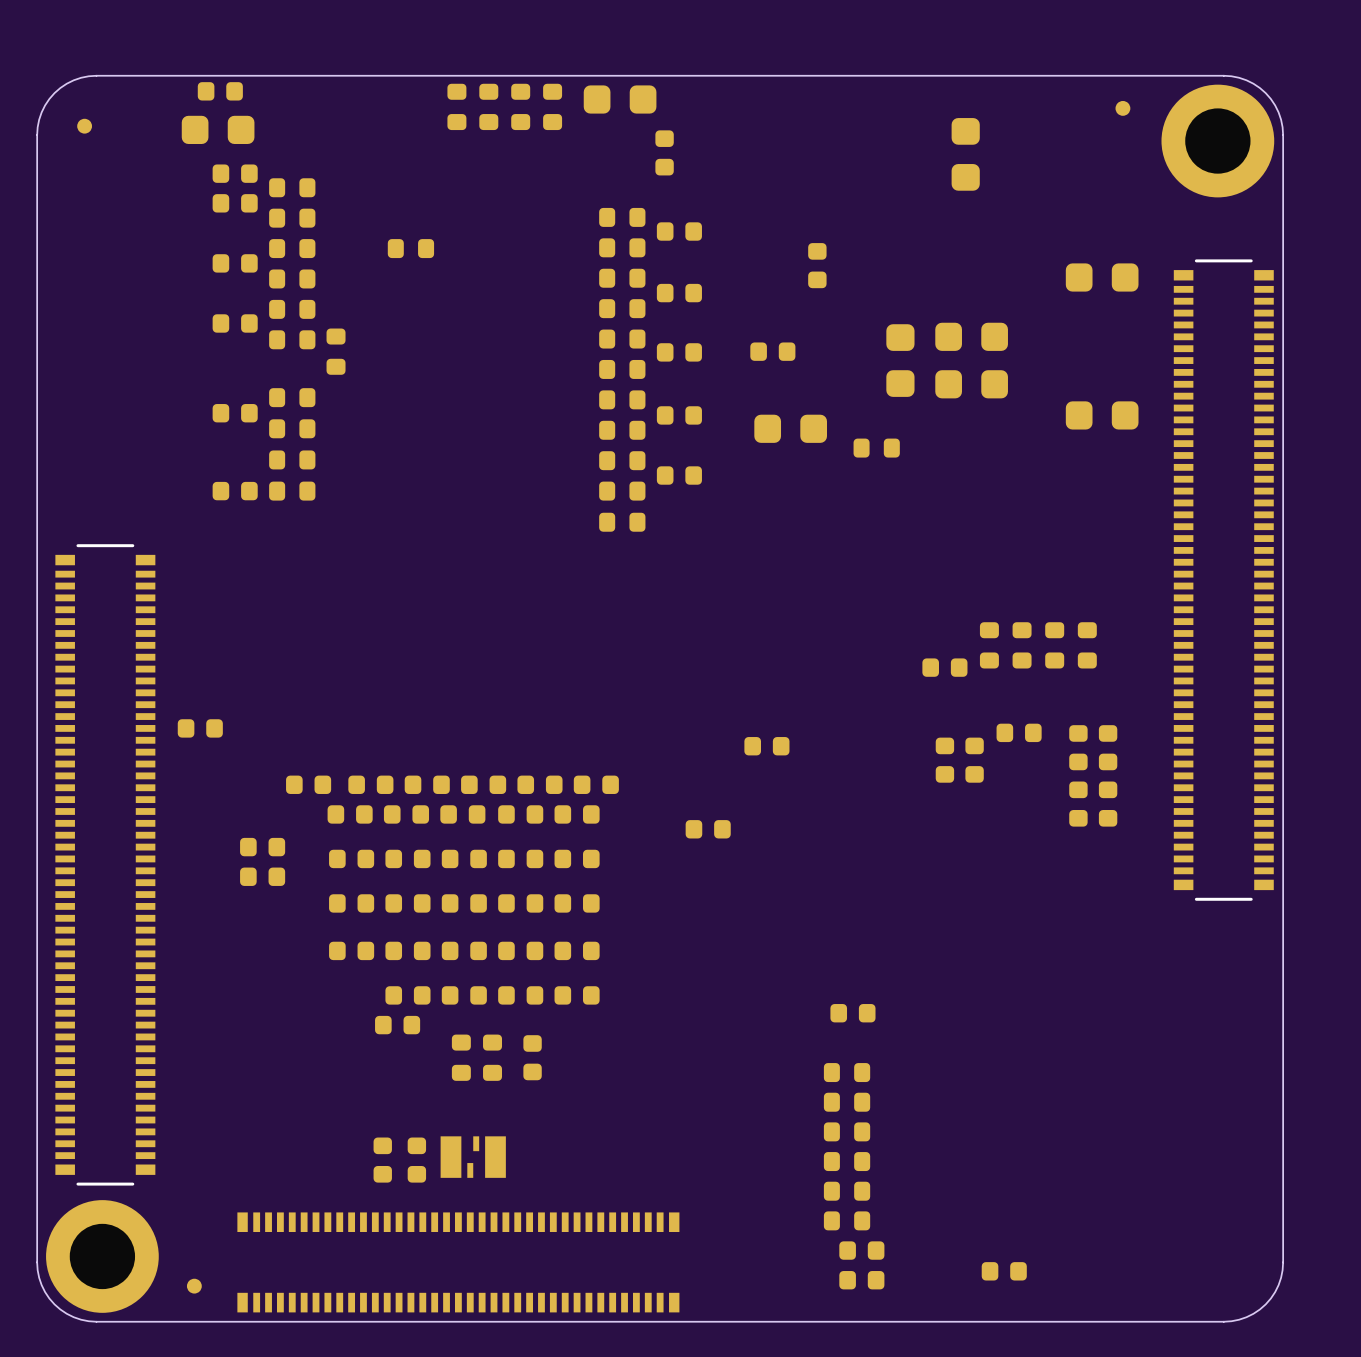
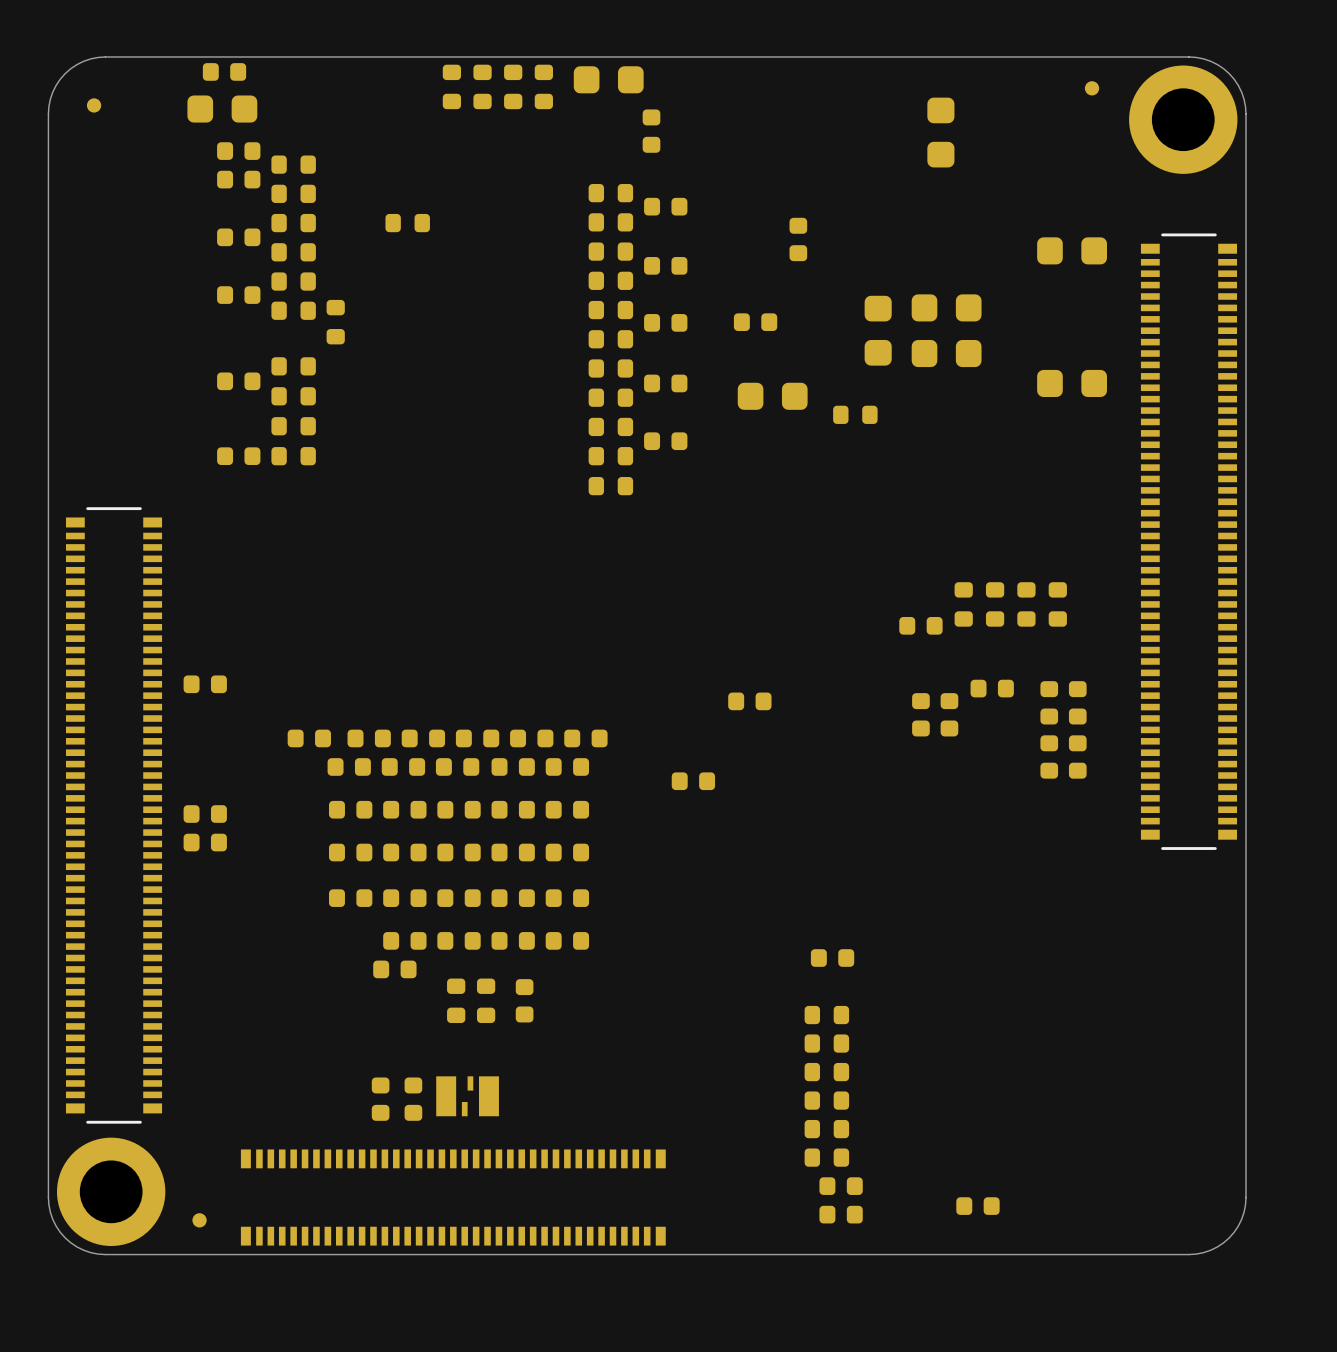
part: (262, 847) -> none
part: none -> (205, 814)
part: (262, 876) -> none
part: none -> (205, 842)

